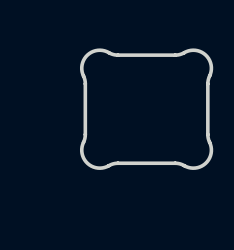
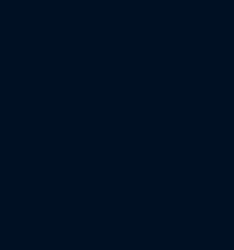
part: (146, 109) -> none

